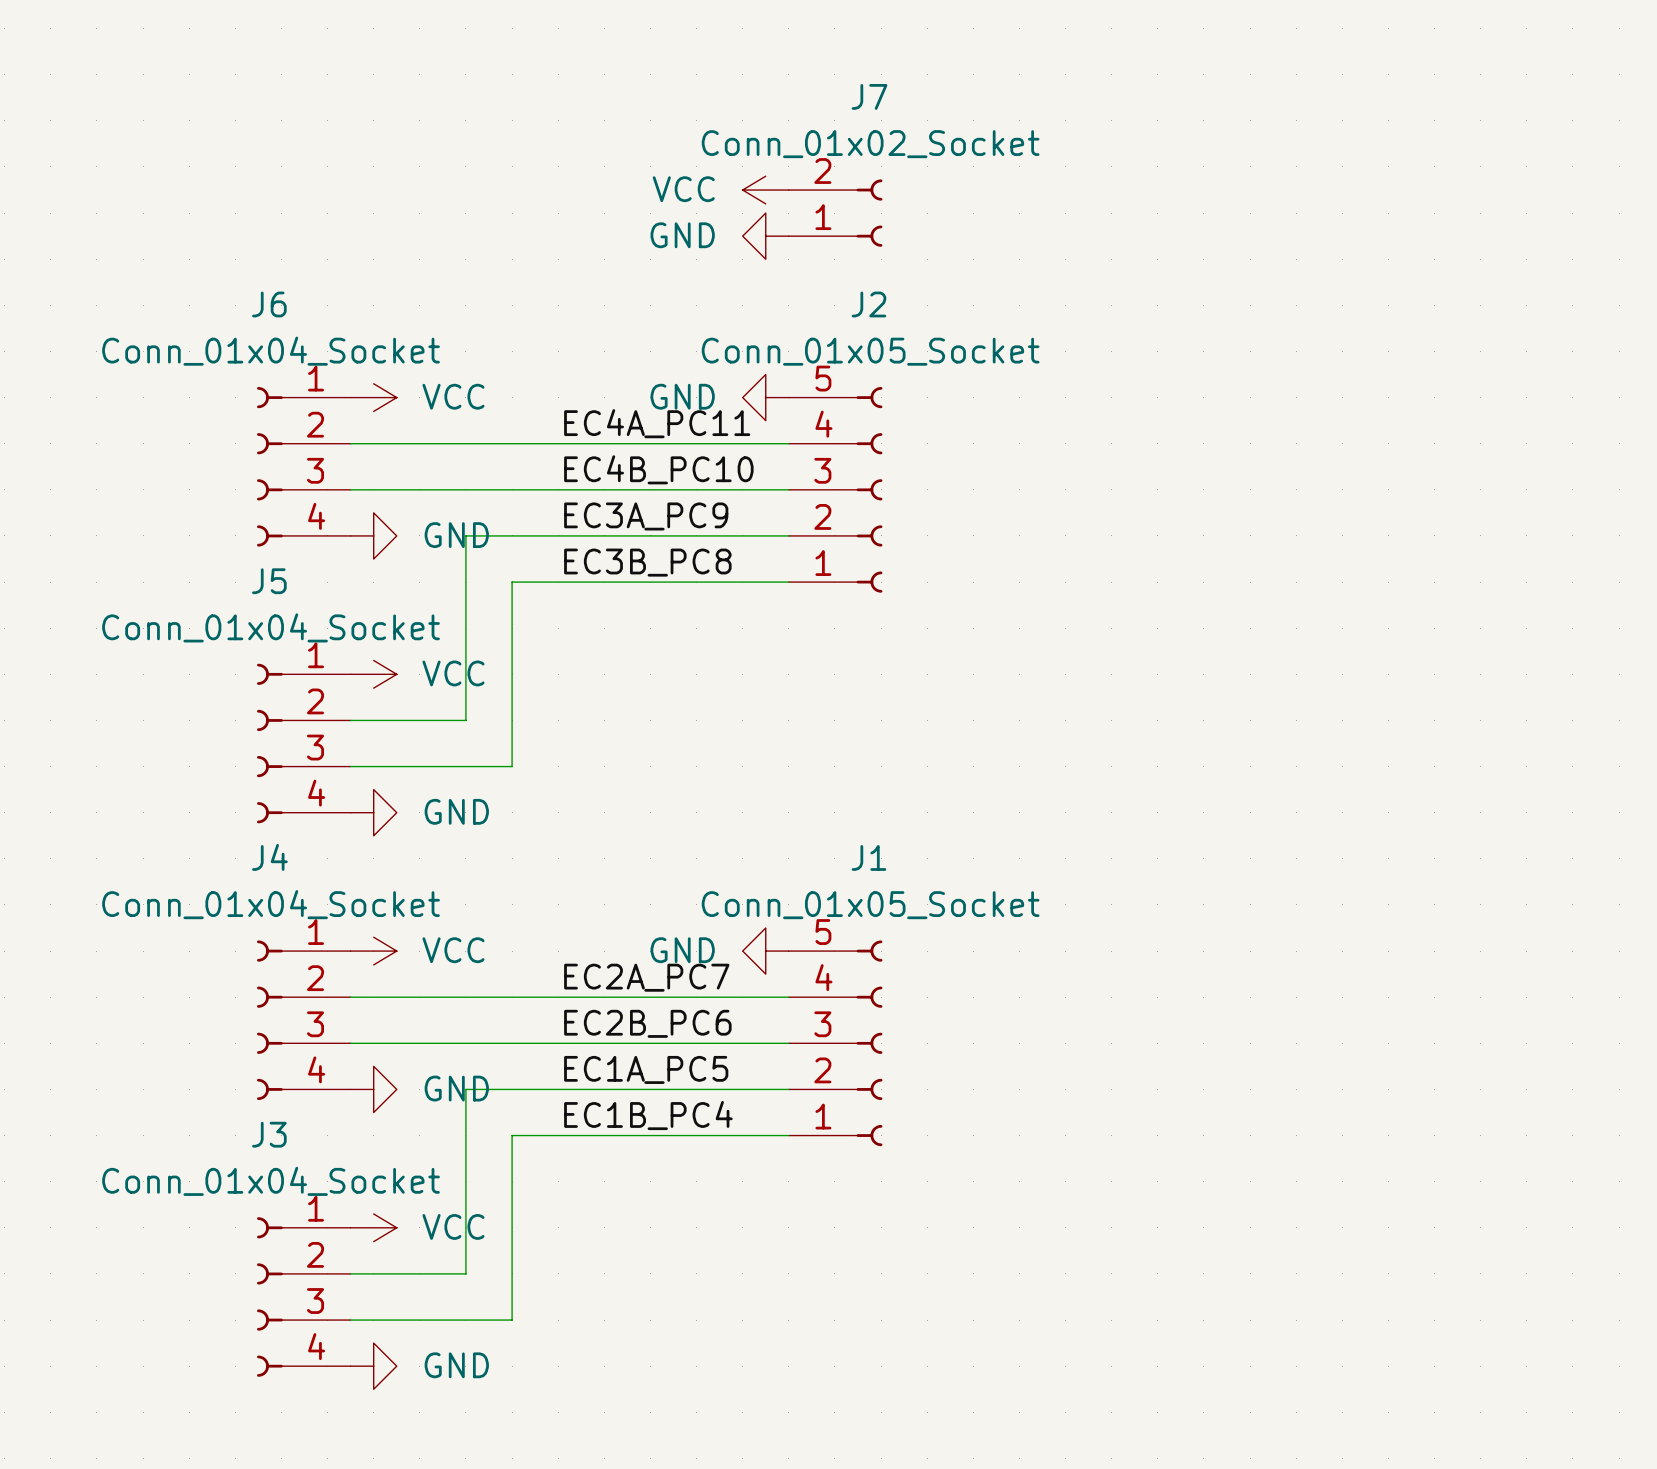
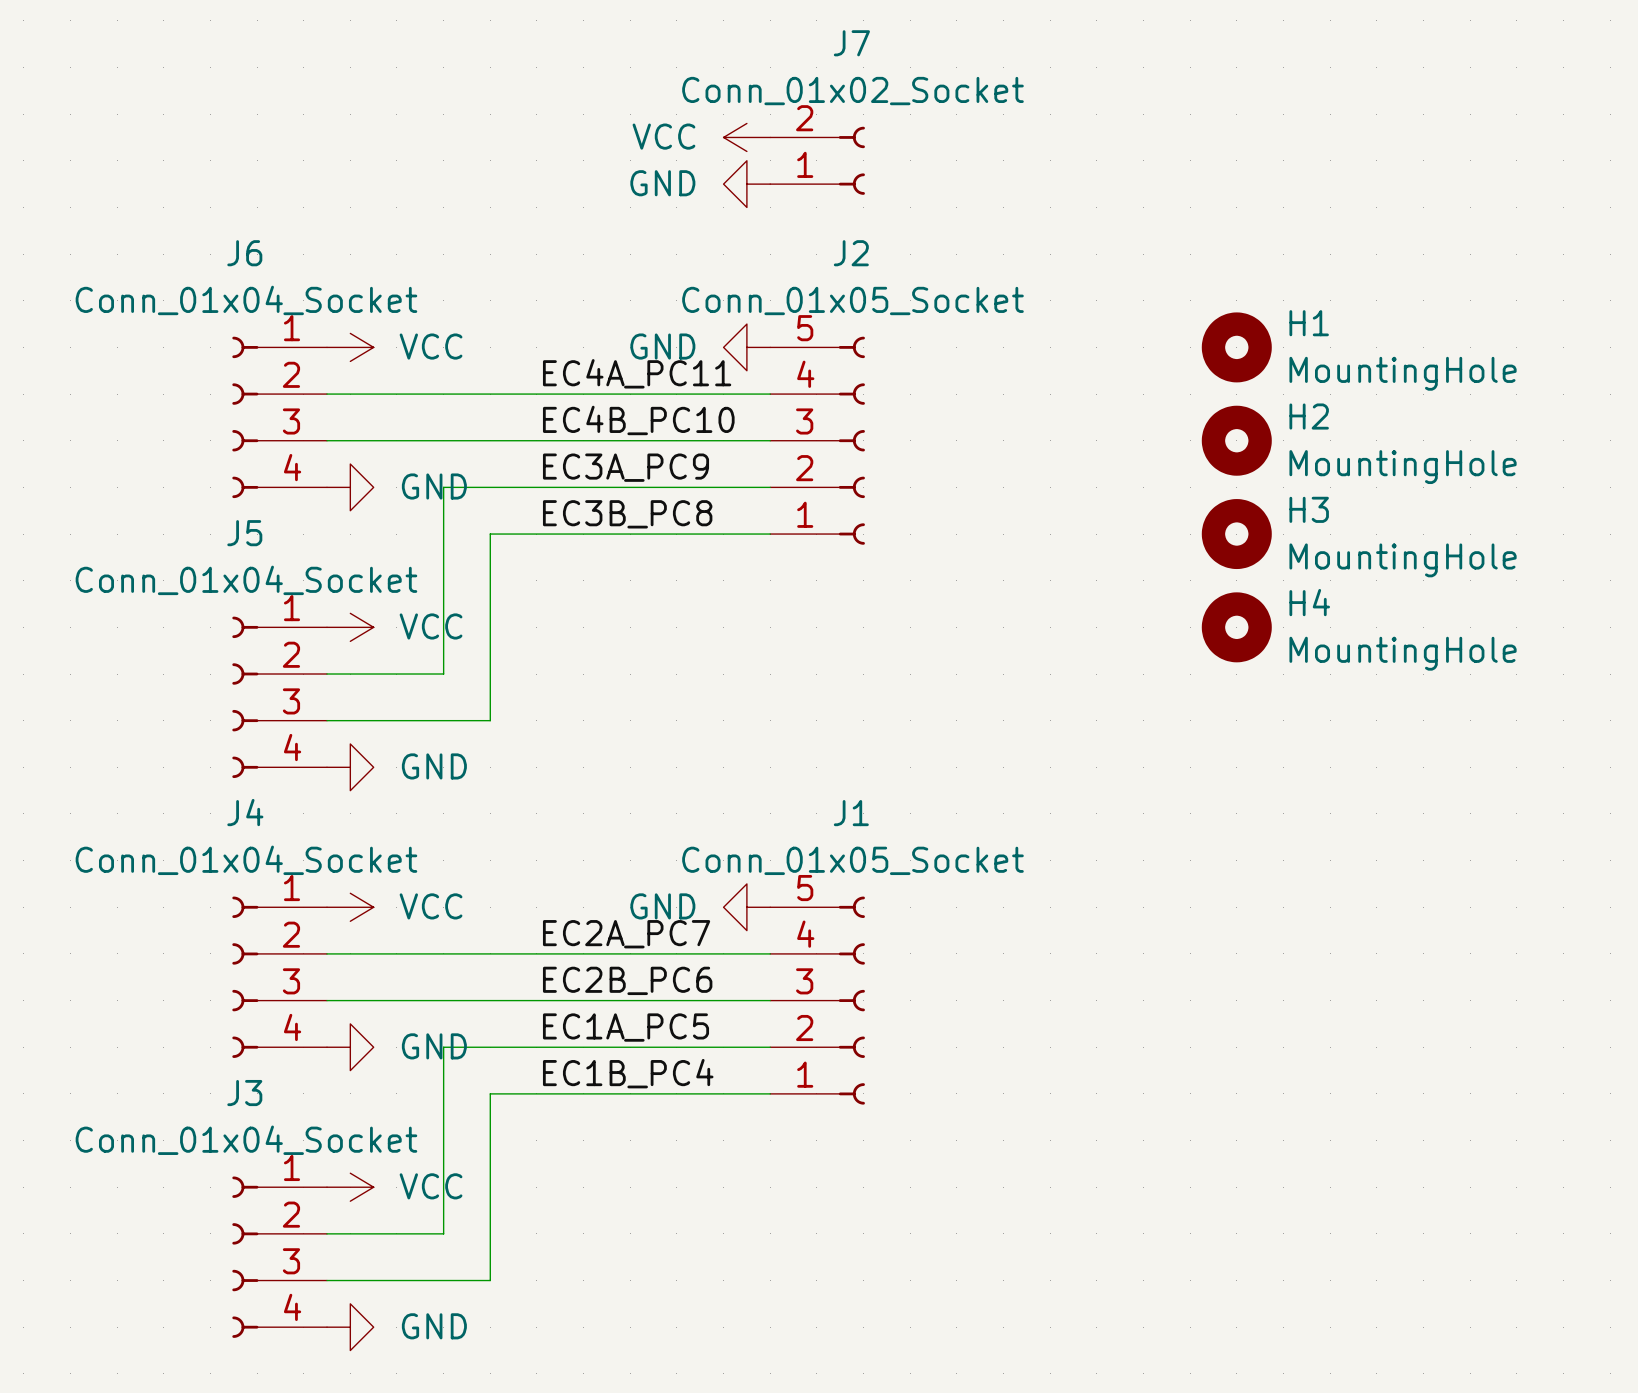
H1: none -> MountingHole (1236, 347)
H2: none -> MountingHole (1236, 440)
H3: none -> MountingHole (1236, 534)
H4: none -> MountingHole (1236, 627)

